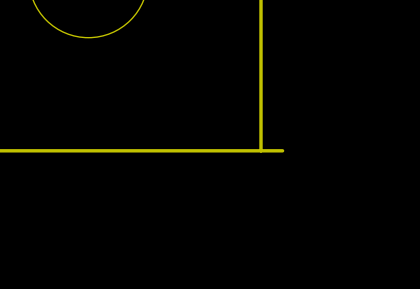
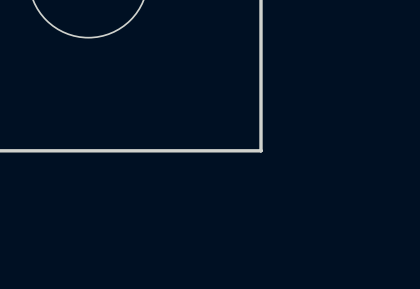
board edge: (260, 150) (282, 150) -> none

